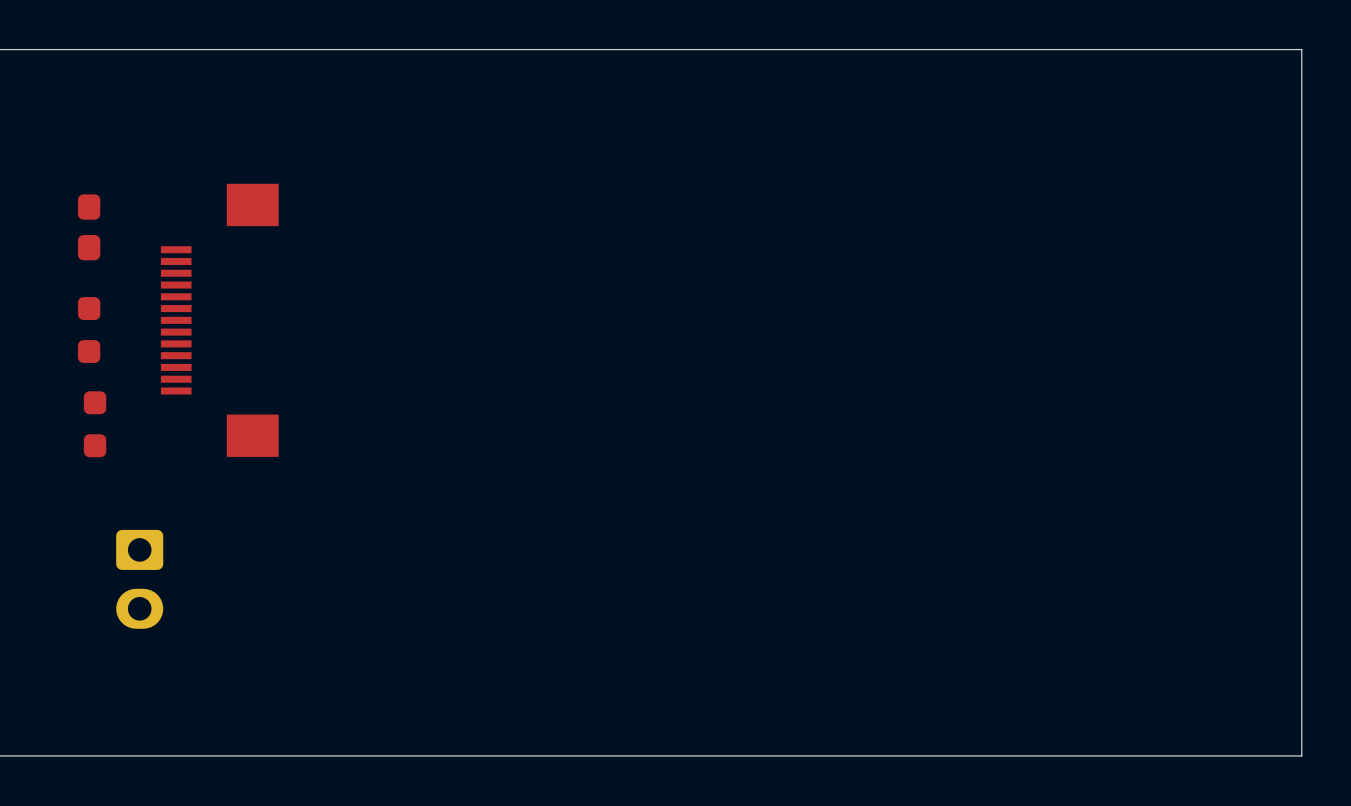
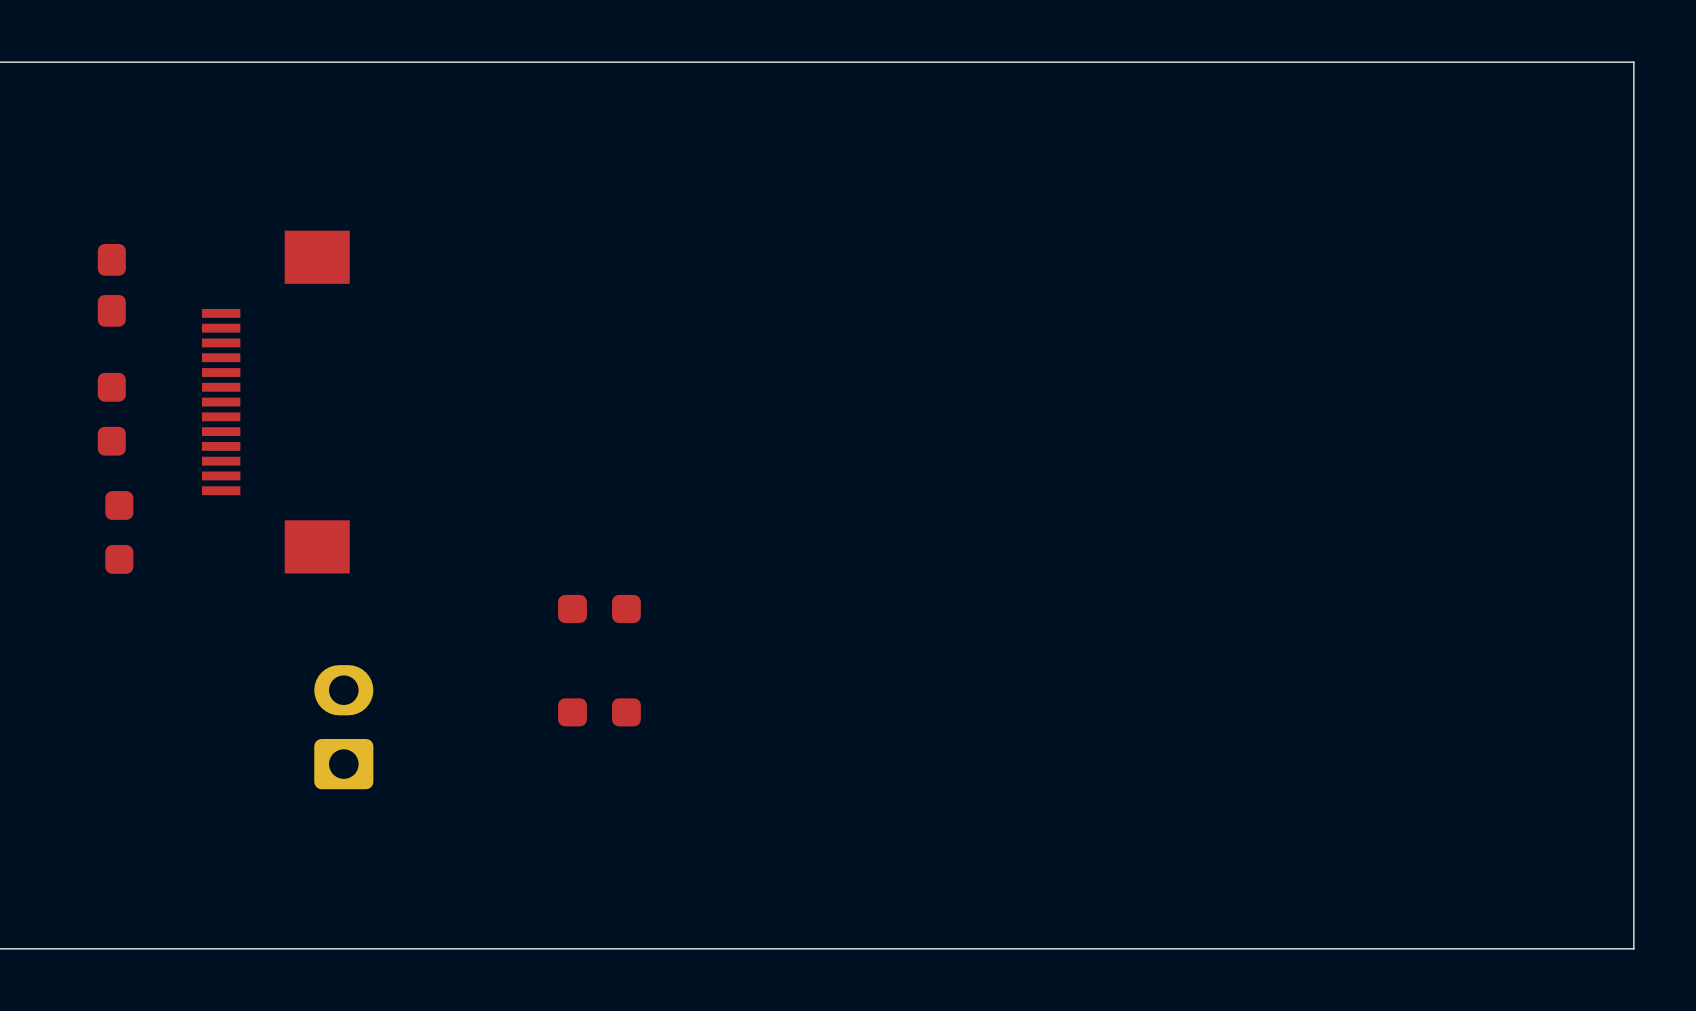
part: none -> (599, 608)
part: none -> (599, 712)
part rotation: 0° (139, 579) -> 180° (343, 727)
part position: (139, 579) -> (343, 727)

